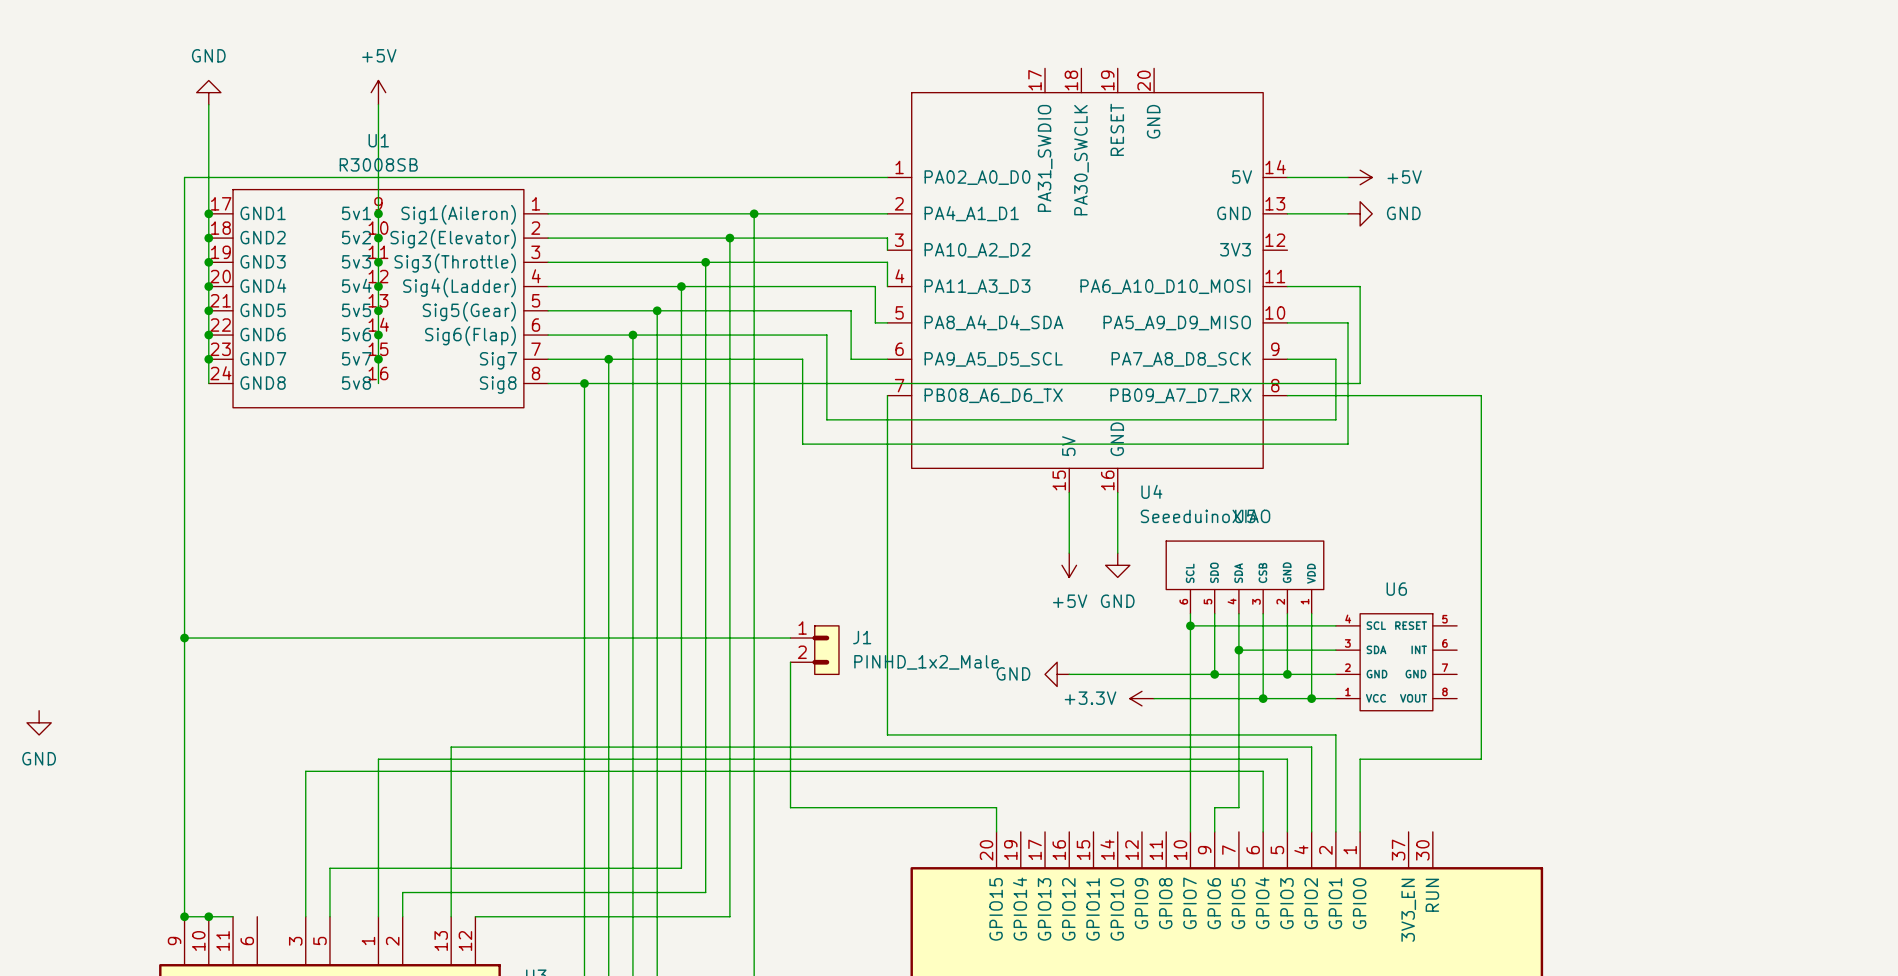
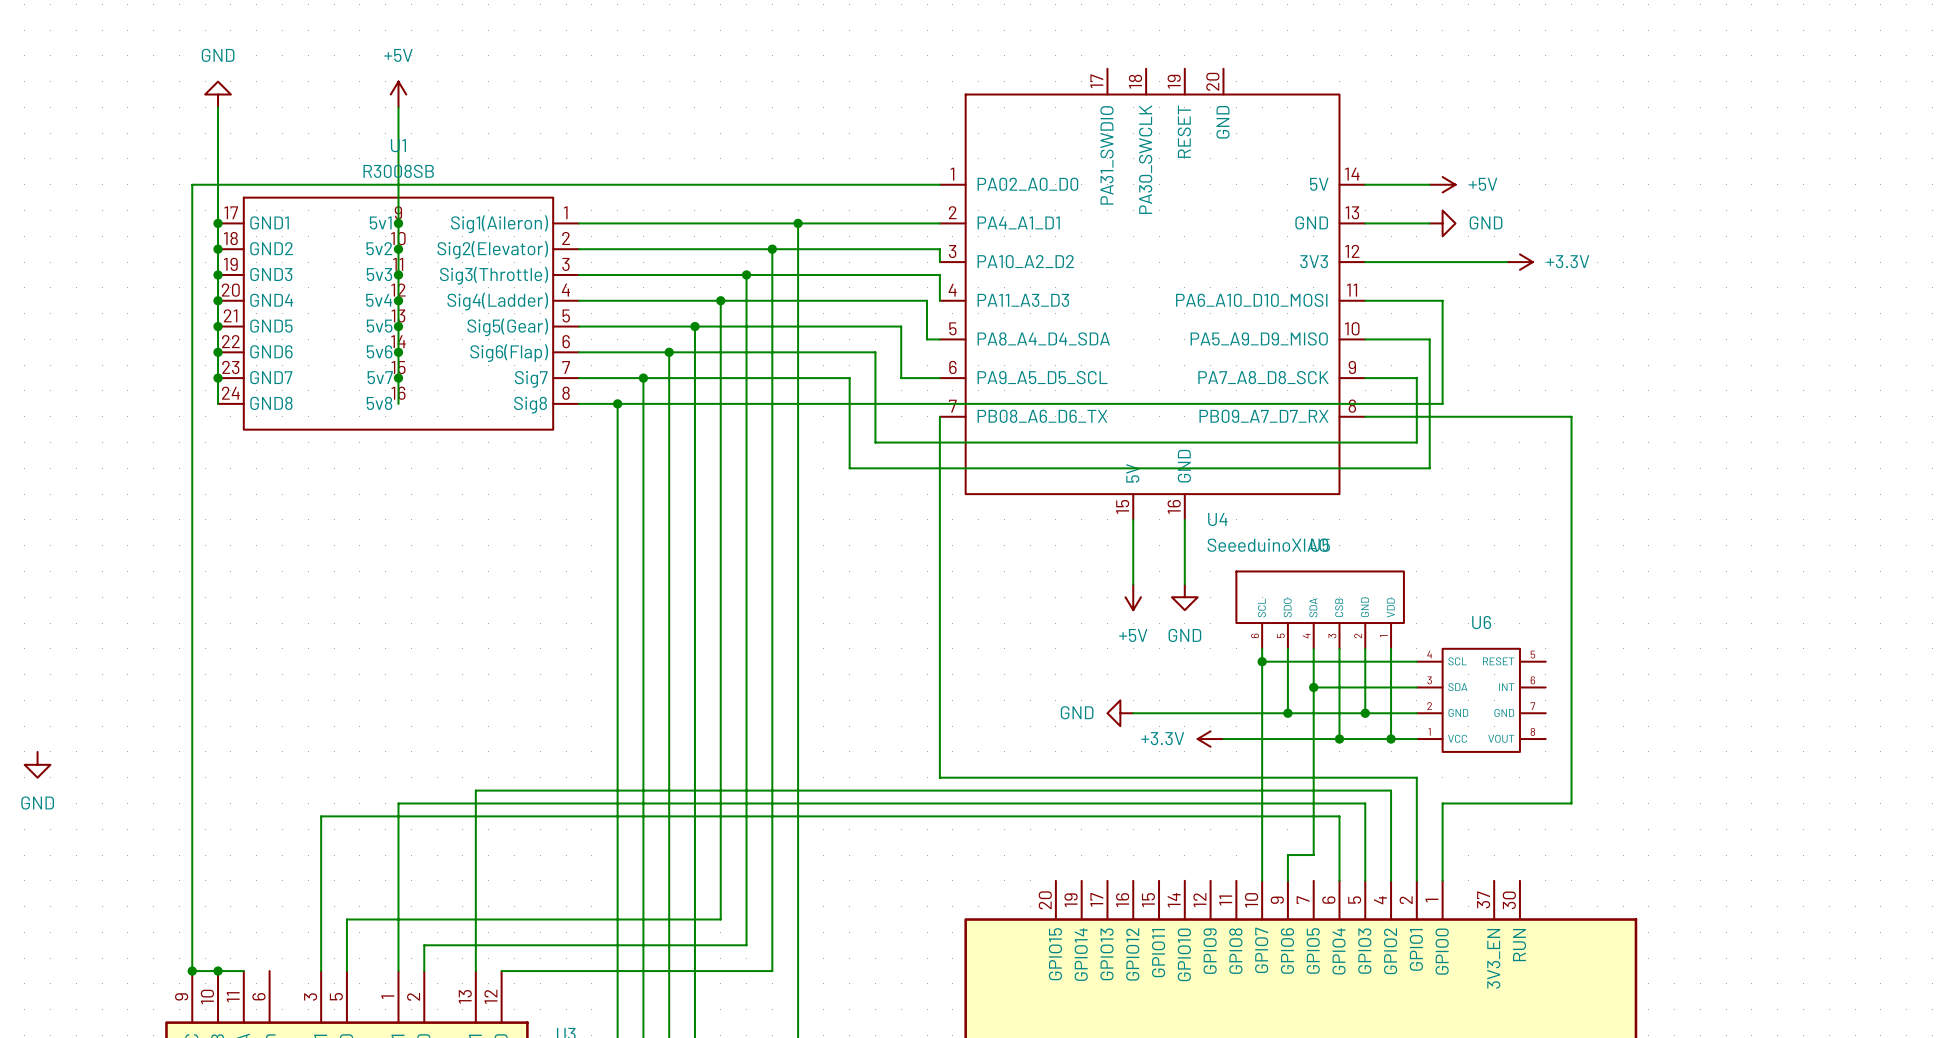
wire: none -> (1365, 262) (1507, 262)
power symbol: none -> +3.3V (1519, 262)
wire: (184, 638) (790, 638) -> none
junction: (184, 638) -> none
J1: PINHD_1x2_Male (814, 650) -> none
wire: (790, 662) (790, 807) (996, 807) (996, 831) -> none

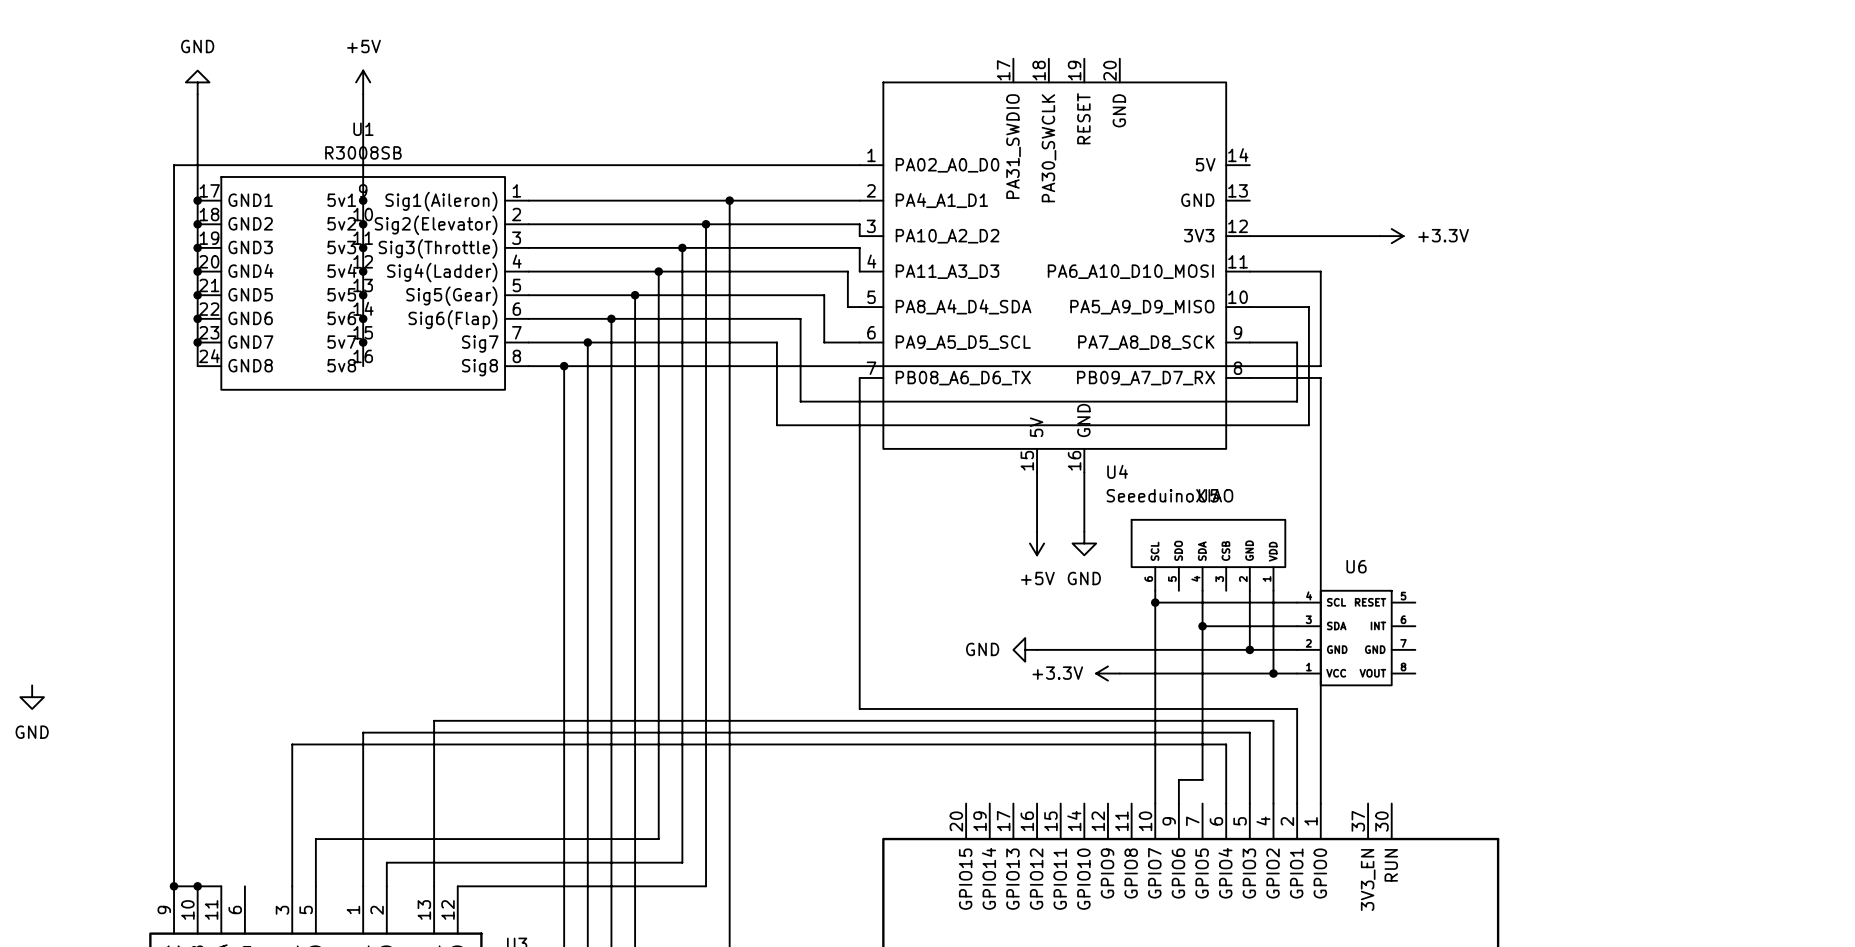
wire: (1365, 184) (1429, 184) -> none
power symbol: +5V (1442, 184) -> none
wire: (1365, 223) (1429, 223) -> none
power symbol: GND (1442, 223) -> none
wire: (1442, 416) (1571, 416) (1571, 803) (1442, 803) -> (1320, 377) (1320, 732)
wire: (1287, 648) (1287, 713) -> none
wire: (1339, 648) (1339, 739) -> none
junction: (1287, 713) -> none
junction: (1339, 739) -> none

